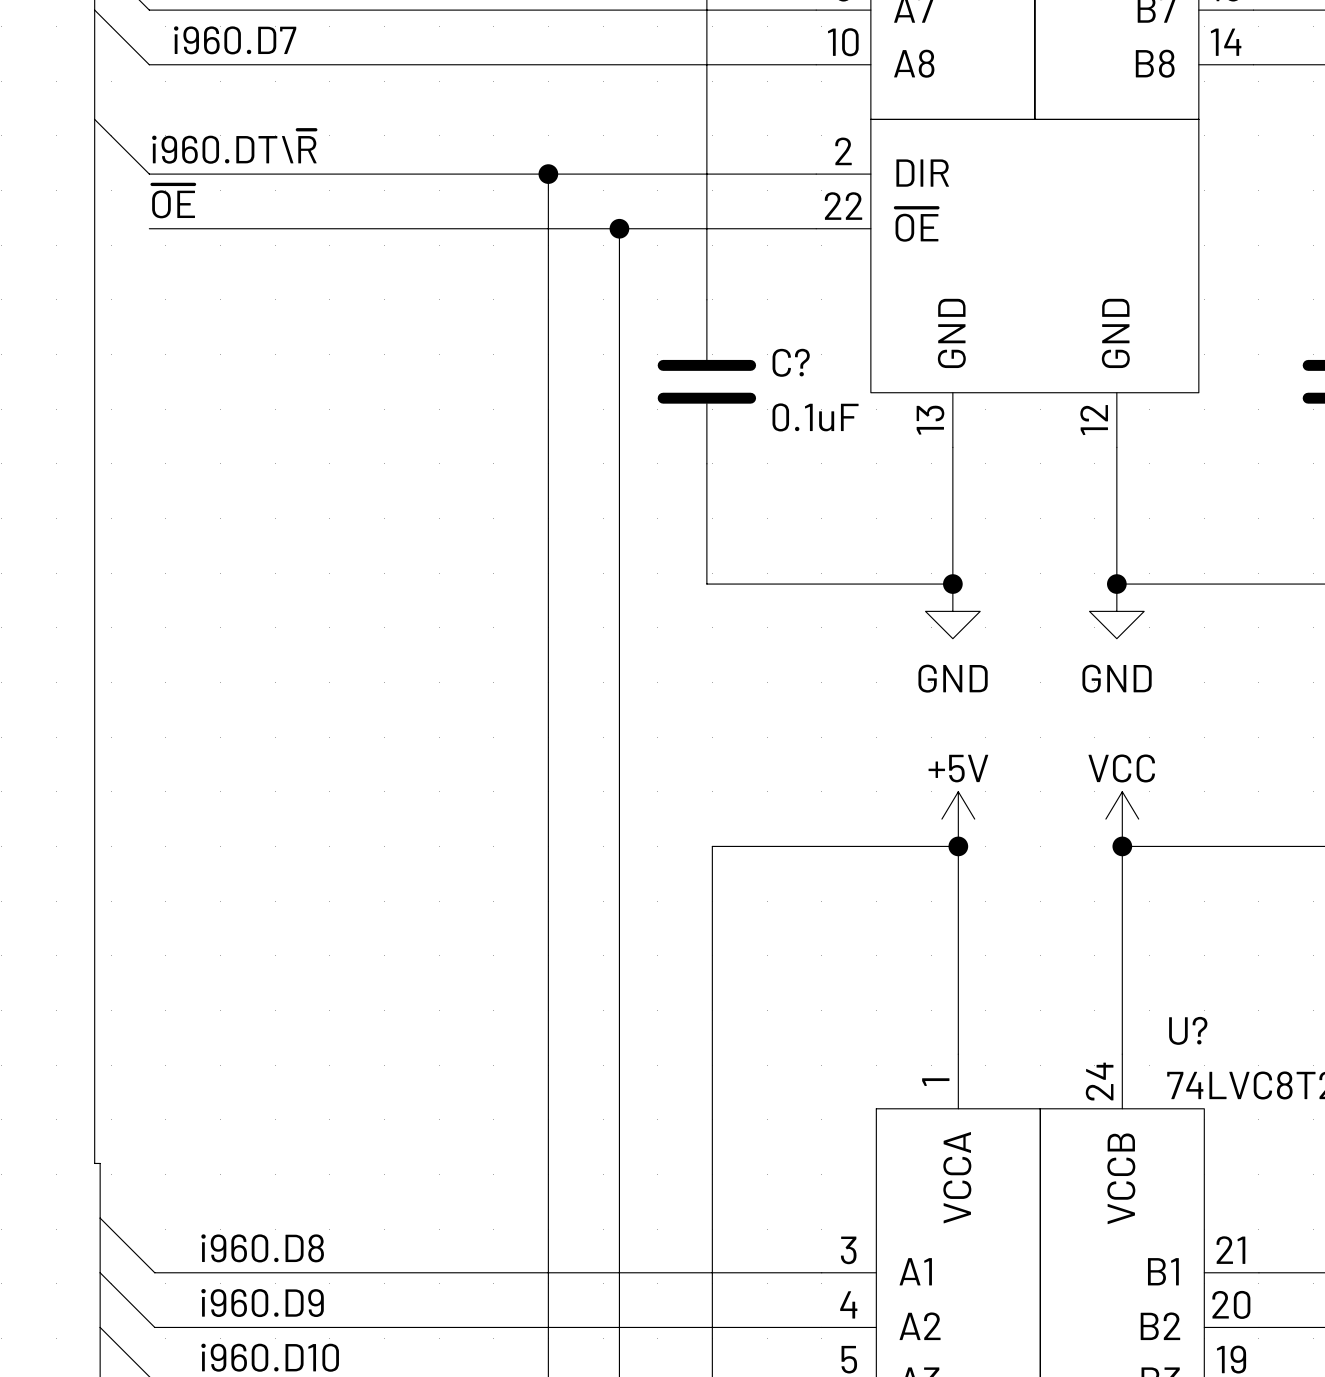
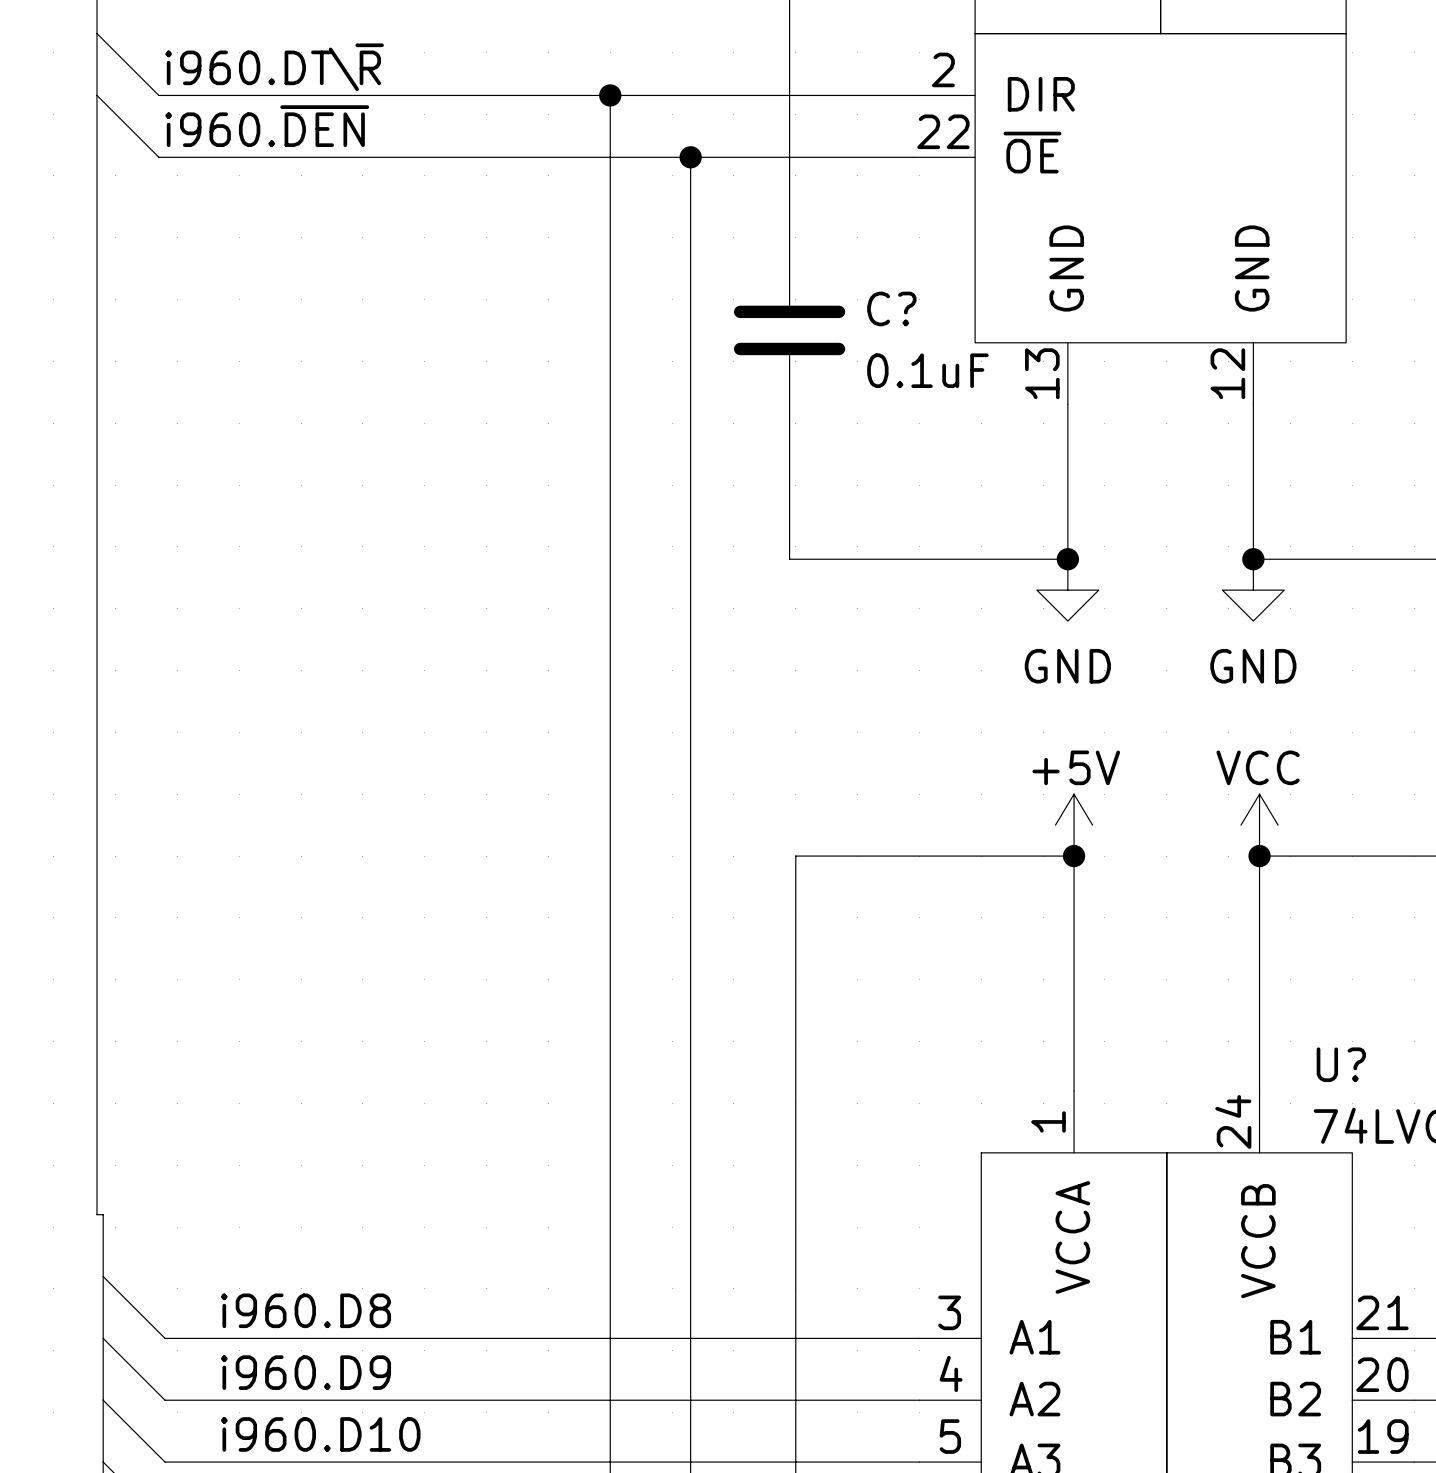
wire: none -> (97, 95) (158, 157)
label: ~{OE} (173, 201) -> i960.~{DEN} (267, 126)

